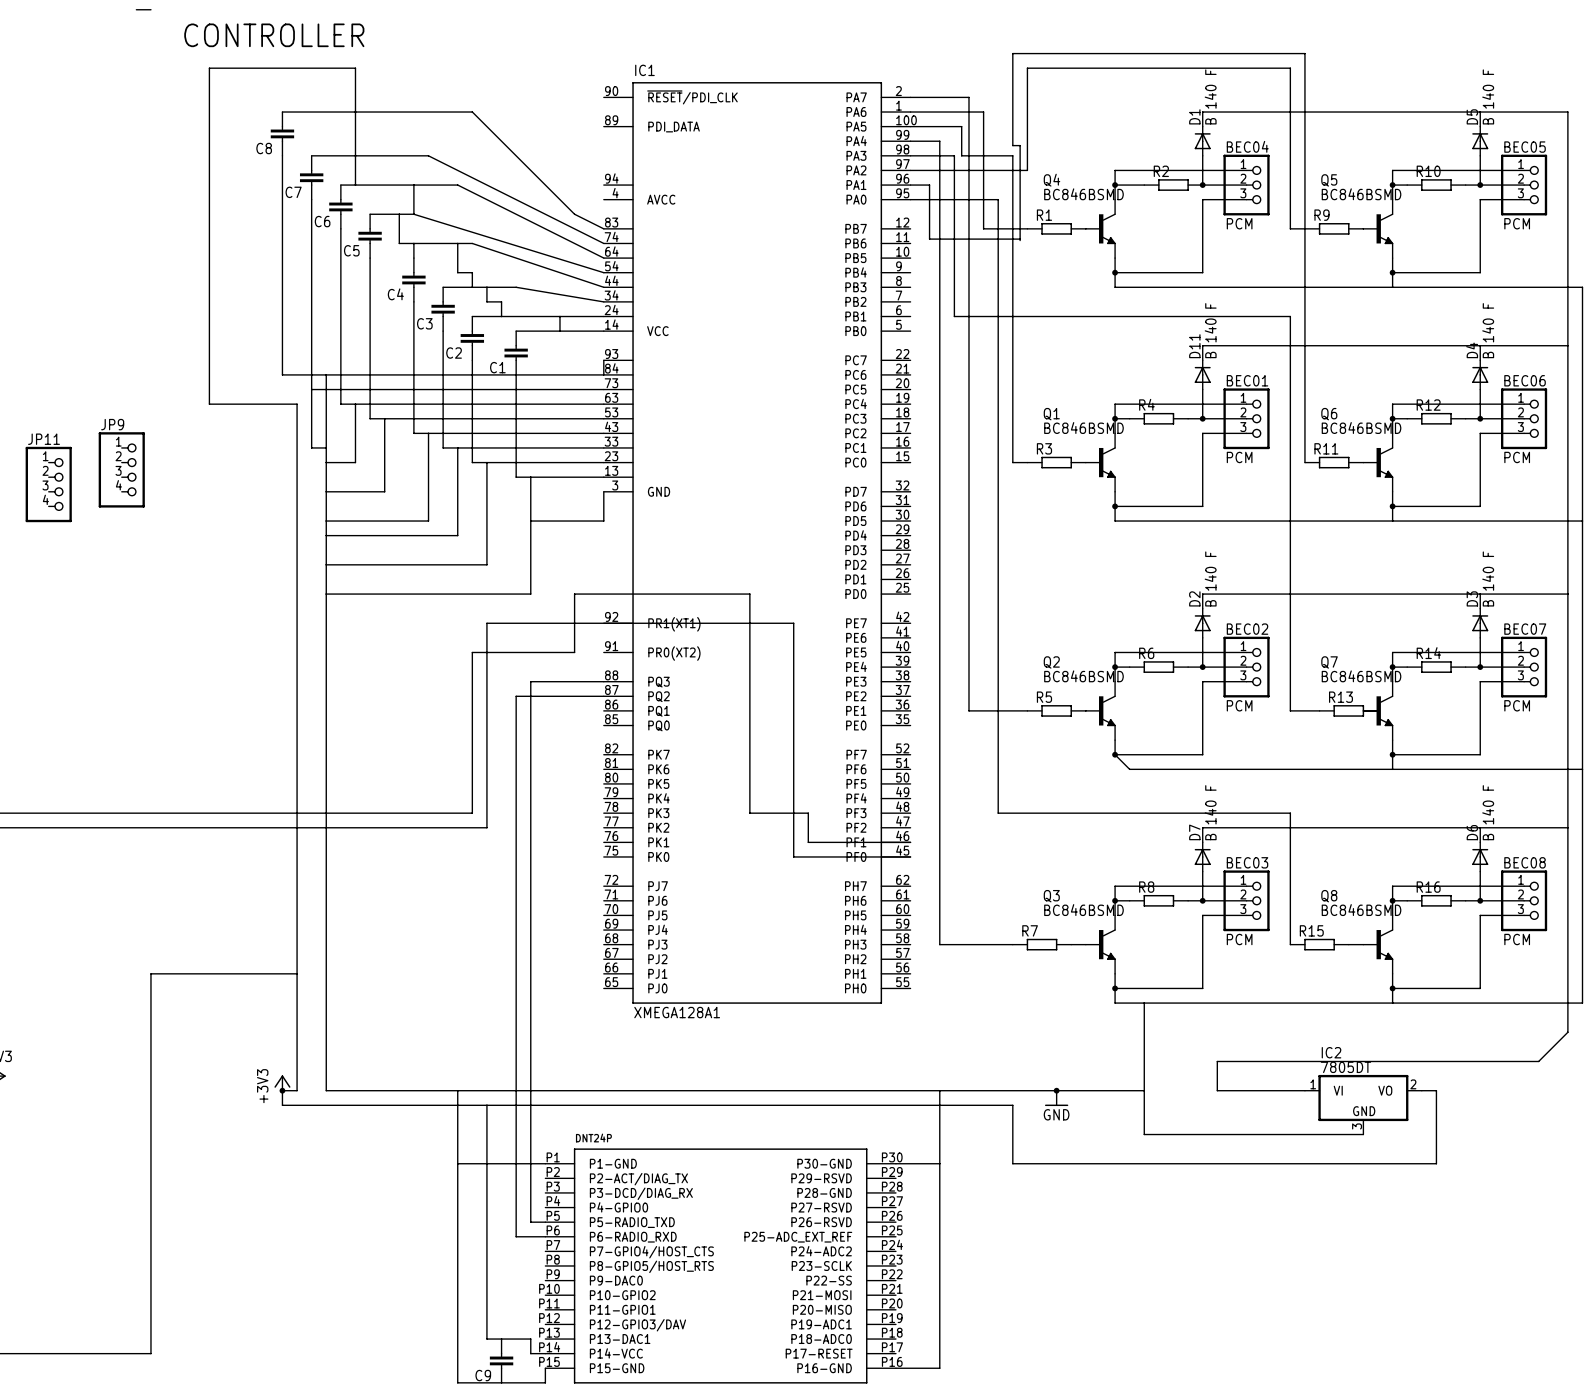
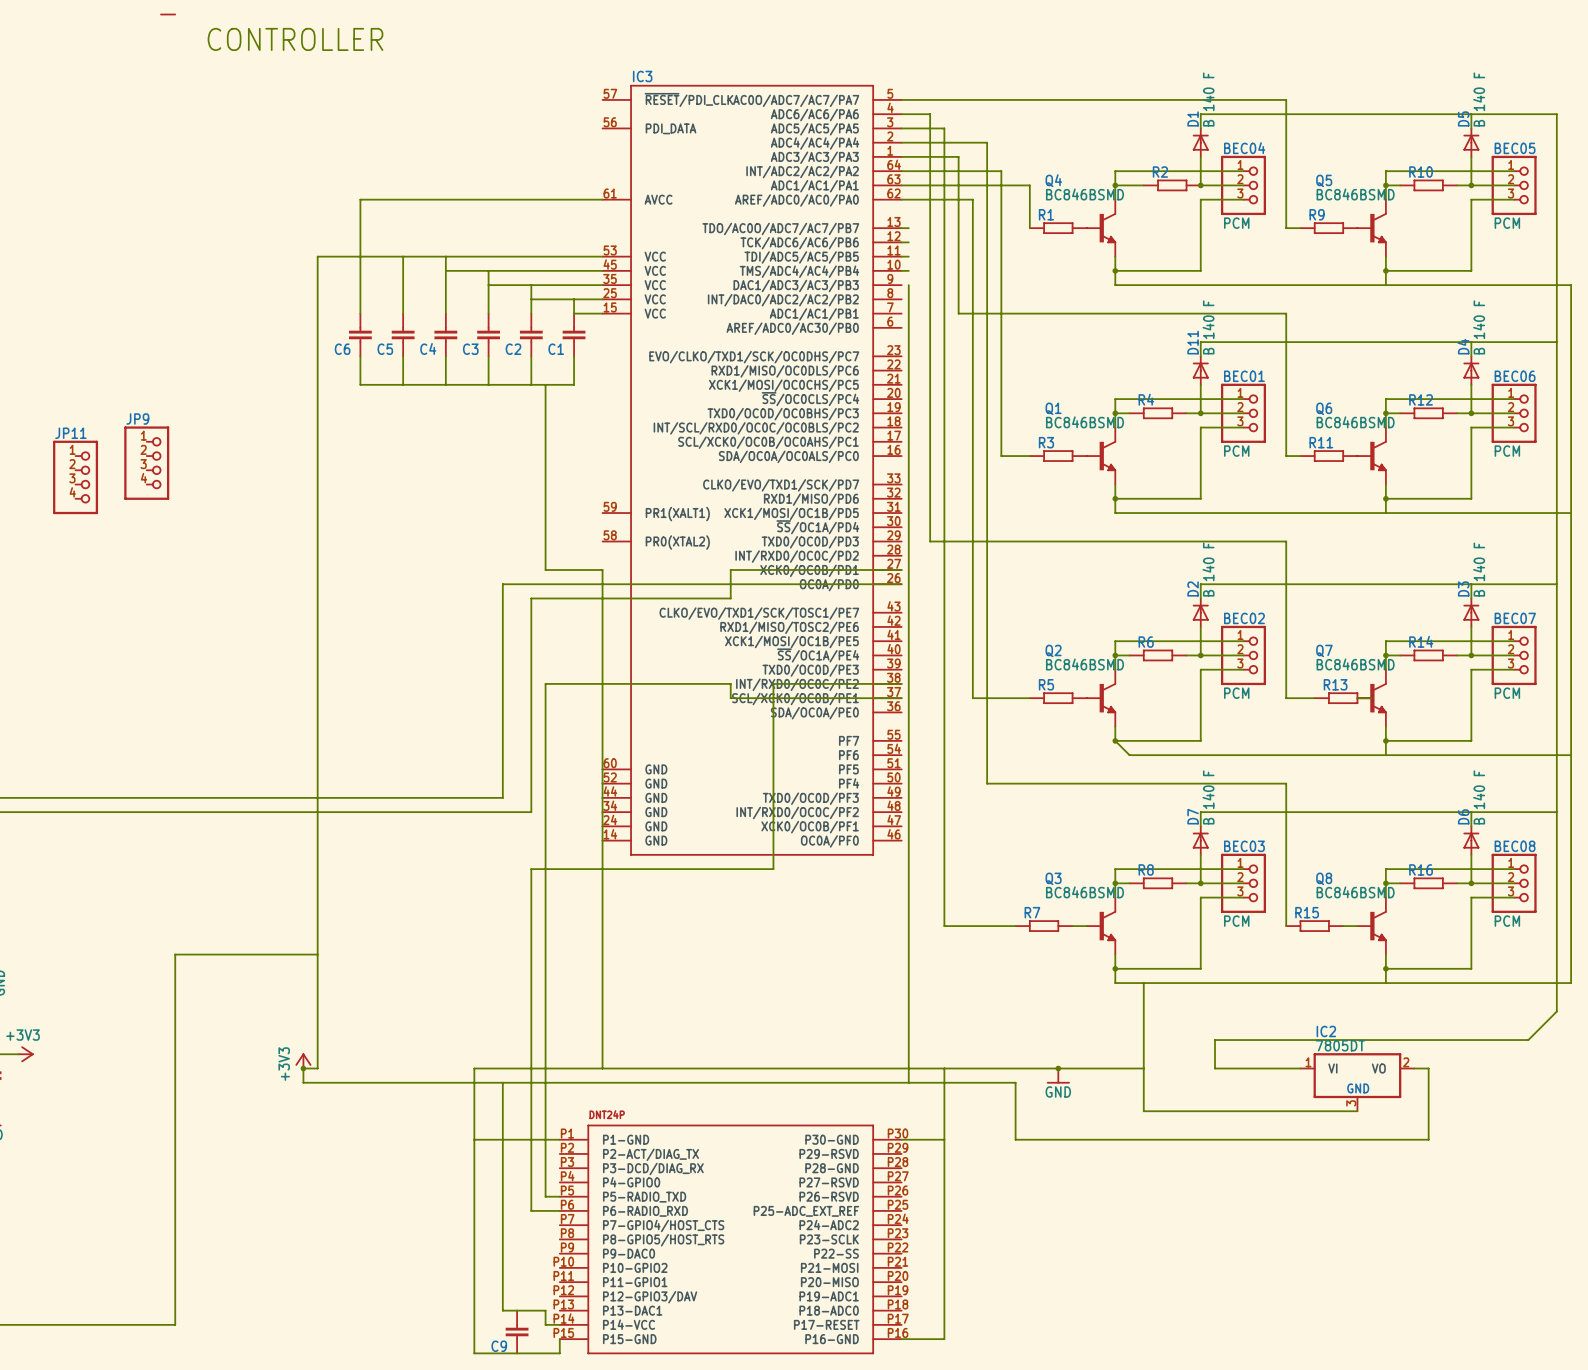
wire: (968, 97) (968, 199) (998, 199) -> (1001, 171) (1001, 199)
wire: (1290, 97) (1290, 68) (1027, 68) (1027, 170) (998, 170) -> (1286, 99) (972, 99)
wire: (282, 112) (472, 112) (574, 214) (603, 228) -> none
wire: (925, 112) (983, 112) (983, 141) -> (944, 128) (944, 142) (987, 142)
wire: none -> (930, 114) (930, 541) (1286, 541)
wire: (939, 126) (961, 126) (961, 155) (1012, 155) (1012, 462) -> (1001, 456) (1015, 456)
C8: (282, 133) -> none
wire: (282, 155) (282, 374) (603, 374) (603, 360) -> none
wire: (311, 155) (428, 155) (603, 243) -> none
C7: (311, 177) -> none
wire: (340, 185) (457, 185) (603, 258) -> none
wire: (355, 185) (355, 68) (209, 68) (209, 404) (297, 404) -> (602, 256) (317, 256) (317, 399)
wire: (413, 185) (413, 214) -> none
wire: (929, 185) (929, 239) (1020, 239) -> (934, 185) (1029, 185) (1029, 228)
wire: (311, 199) (311, 447) (326, 447) -> none
wire: none -> (602, 199) (360, 199) (360, 228)
C6 position: (340, 206) -> (360, 334)
wire: (370, 214) (413, 214) -> none
wire: (399, 214) (399, 243) (472, 243) (603, 287) -> none
wire: (413, 214) (603, 272) -> none
wire: (983, 228) (1027, 228) -> none
C5 position: (370, 236) -> (403, 334)
wire: (1020, 240) (1020, 145) (1012, 145) (1012, 53) (1304, 53) (1304, 462) -> none
wire: (413, 243) (413, 258) -> none
wire: (457, 243) (457, 272) -> (445, 270) (474, 270)
wire: (370, 258) (370, 418) (603, 418) -> none
wire: none -> (403, 256) (403, 313)
wire: none -> (445, 256) (445, 313)
wire: none -> (488, 270) (602, 270)
C4 position: (413, 279) -> (445, 334)
wire: (443, 287) (472, 287) -> (488, 313) (488, 285)
wire: (486, 287) (486, 301) (501, 301) (501, 316) -> none
wire: (516, 287) (603, 301) -> none
wire: none -> (602, 285) (531, 285) (531, 313)
wire: none -> (908, 285) (908, 1082)
wire: (413, 301) (413, 433) (603, 433) -> none
wire: none -> (531, 299) (602, 299)
wire: none -> (574, 299) (574, 313)
C3: (443, 309) -> none
wire: (472, 316) (559, 316) (559, 331) -> none
wire: (443, 331) (443, 447) (603, 447) -> none
wire: (516, 331) (603, 331) -> none
C2: none -> (531, 334)
C2 name: C2 (454, 353) -> C3 (470, 349)
C1 position: (516, 353) -> (574, 334)
wire: none -> (403, 356) (403, 384)
wire: none -> (445, 356) (445, 384)
wire: (326, 374) (326, 1090) (457, 1090) -> none
wire: (311, 389) (340, 389) (340, 404) (603, 404) -> none
wire: (472, 389) (472, 462) (603, 462) -> none
wire: (516, 389) (516, 477) (603, 477) -> none
wire: none -> (545, 384) (545, 470)
wire: (559, 389) (603, 389) -> (574, 384) (574, 356)
wire: (355, 404) (355, 462) (326, 462) -> none
wire: (384, 418) (384, 491) (326, 491) -> none
wire: (428, 433) (428, 521) (326, 521) -> none
wire: (457, 447) (457, 535) (326, 535) -> none
wire: (486, 462) (486, 564) (326, 564) -> none
wire: (998, 462) (998, 813) (1290, 813) -> (987, 228) (987, 783) (1286, 783) (1286, 797)
wire: (1290, 462) (1290, 550) -> (1286, 456) (1300, 456)
IC3: none -> (752, 470)
wire: (603, 491) (603, 521) (530, 521) -> none
IC1: XMEGA128A1 (757, 542) -> none
wire: (530, 579) (530, 594) -> (588, 584) (545, 584)
wire: none -> (545, 569) (602, 569) (602, 1068)
wire: (326, 594) (486, 594) -> (502, 612) (502, 584)
wire: (574, 594) (574, 652) (472, 652) (472, 813) -> none
wire: (749, 594) (749, 813) (808, 813) (808, 842) (910, 842) -> (759, 584) (901, 584)
wire: (486, 623) (793, 623) (793, 856) (910, 856) -> none
wire: (603, 681) (530, 681) (530, 696) (516, 696) -> (901, 569) (730, 569) (730, 598) (531, 598) (531, 683)
wire: none -> (616, 683) (730, 683) (730, 698) (901, 698)
wire: none -> (901, 683) (773, 683) (773, 869) (531, 869)
wire: (486, 813) (486, 827) -> (502, 797) (488, 797)
wire: (516, 827) (516, 886) -> (531, 812) (502, 812)

